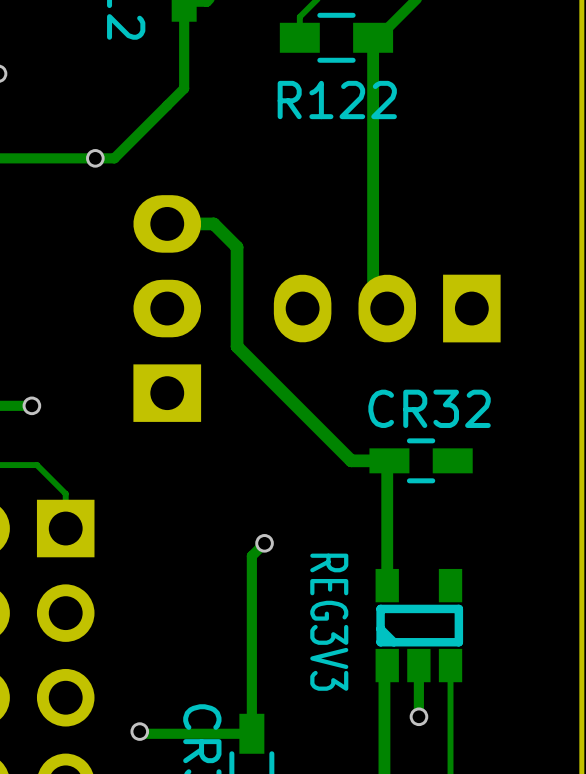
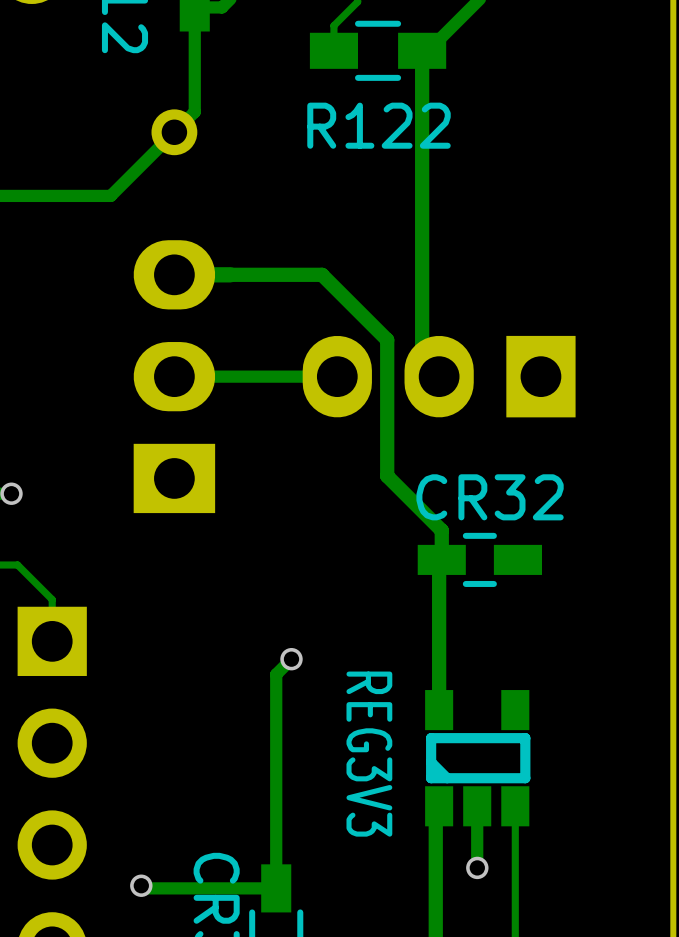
part: none -> (174, 132)
via: (95, 158) -> none
track: (213, 223) (237, 247) (237, 346) (351, 460) (389, 460) -> (230, 274) (322, 274) (387, 339) (387, 476) (441, 530) (441, 559)
track: none -> (337, 376) (174, 376)

